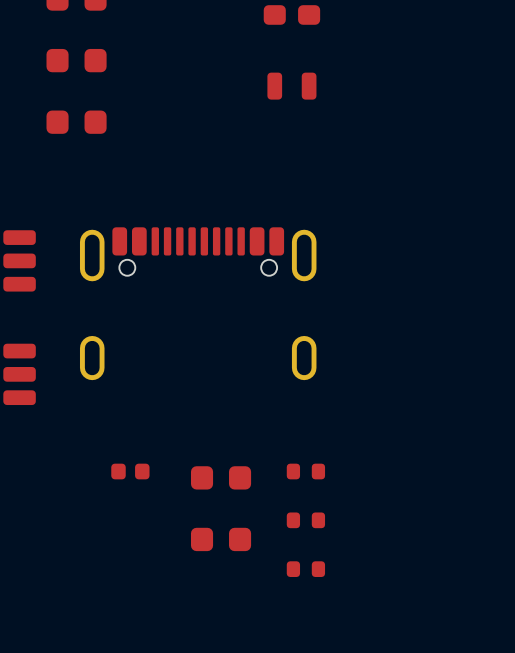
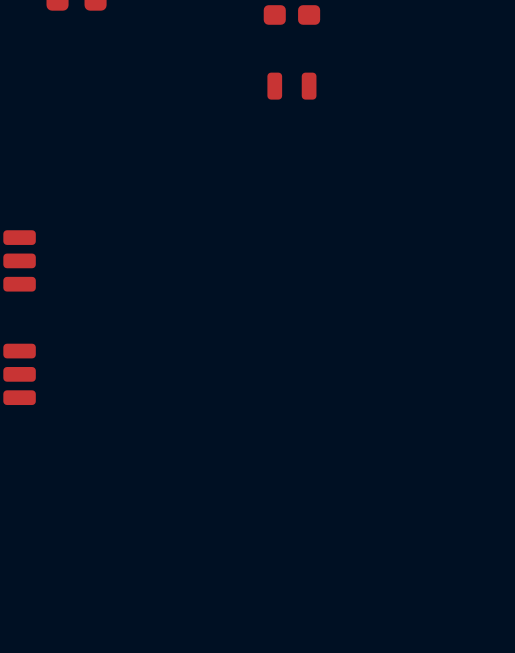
part: (76, 60) -> none
part: (76, 122) -> none
part: (198, 303) -> none
part: (130, 471) -> none
part: (305, 471) -> none
part: (221, 477) -> none
part: (305, 520) -> none
part: (221, 539) -> none
part: (305, 569) -> none

